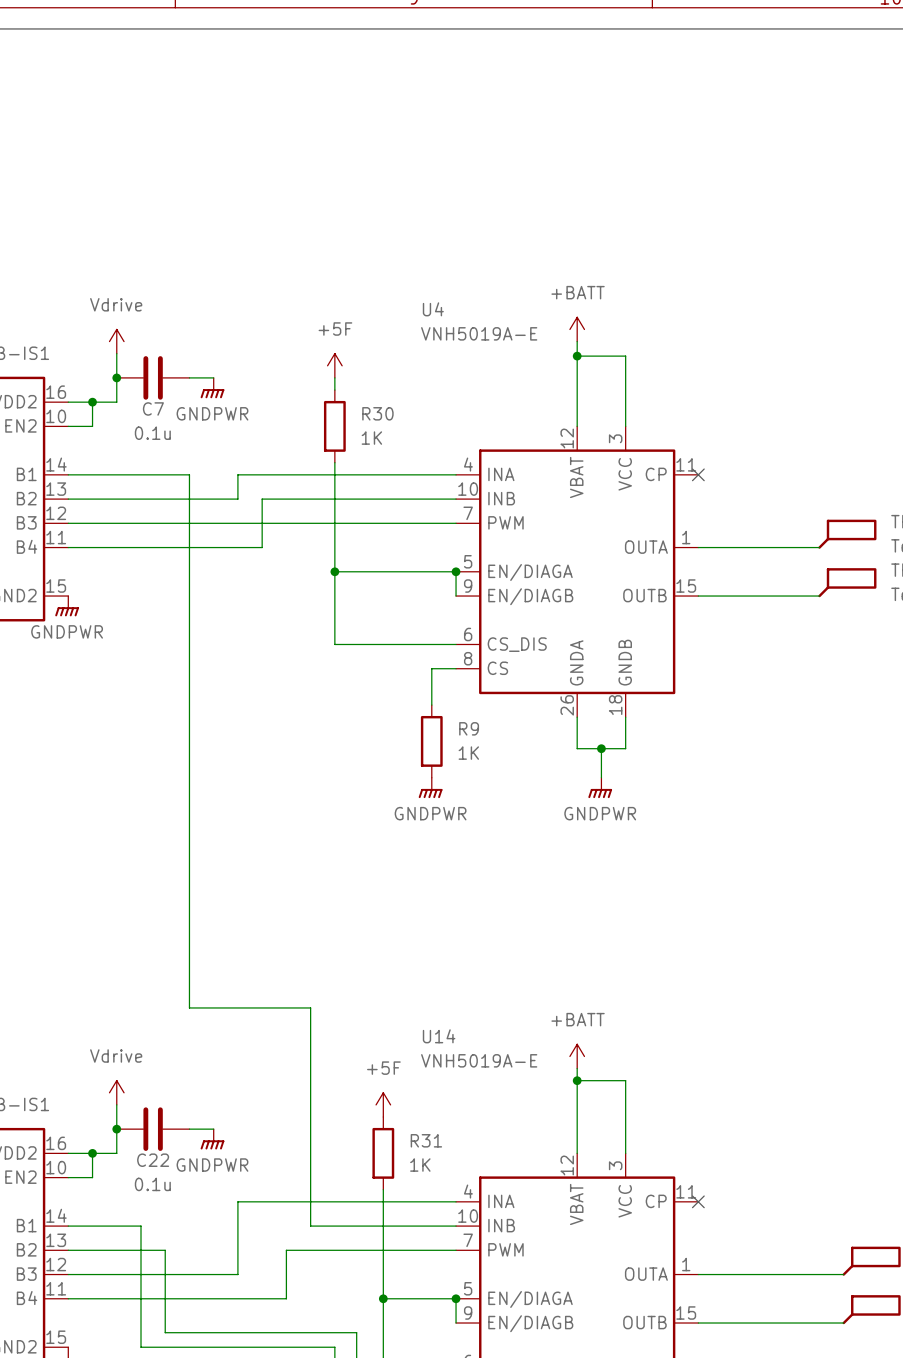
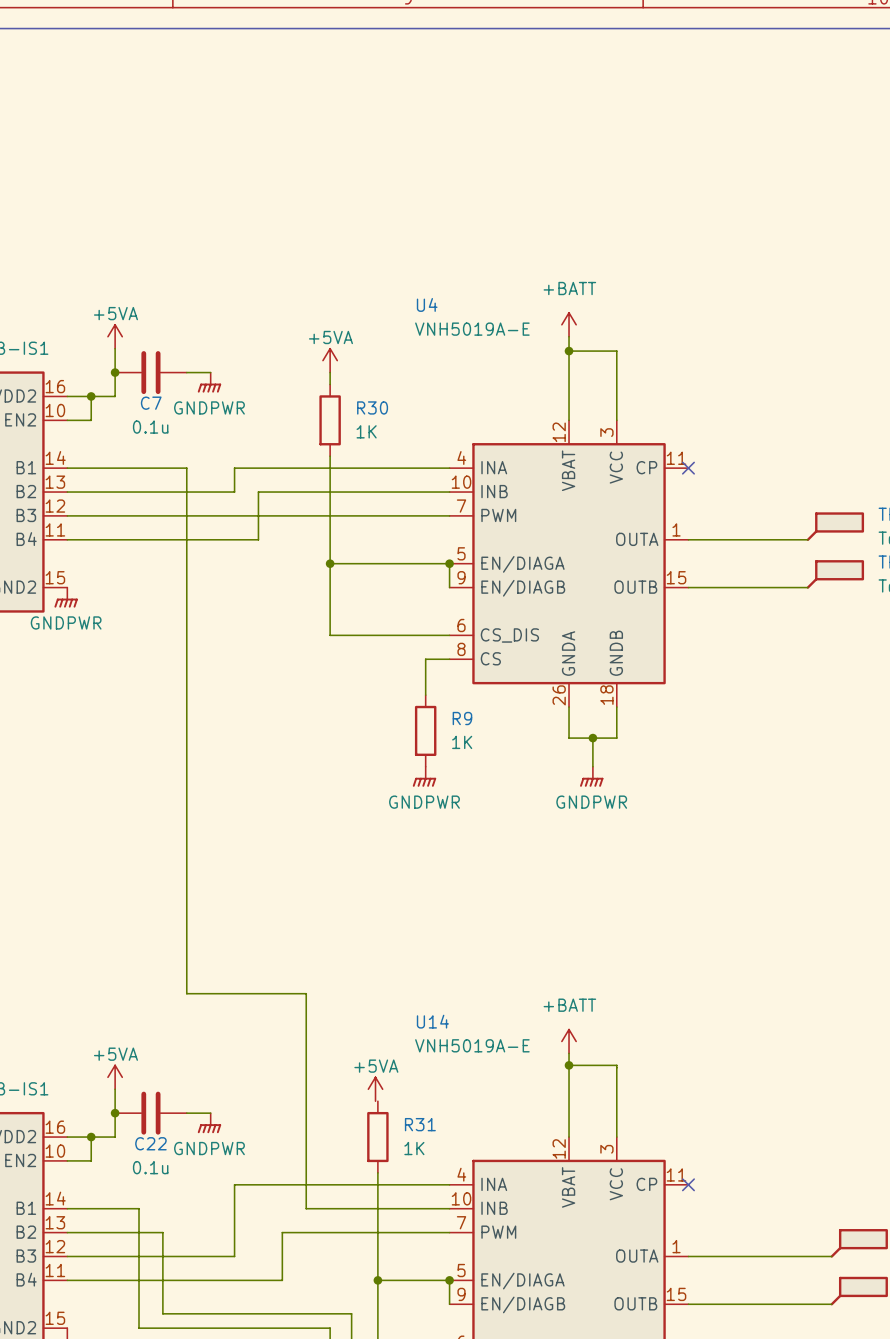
power symbol: Vdrive (116, 341) -> +5VA (115, 336)
power symbol: +5F (334, 365) -> +5VA (330, 360)
power symbol: Vdrive (116, 1092) -> +5VA (115, 1077)
power symbol: +5F (383, 1104) -> +5VA (375, 1089)

